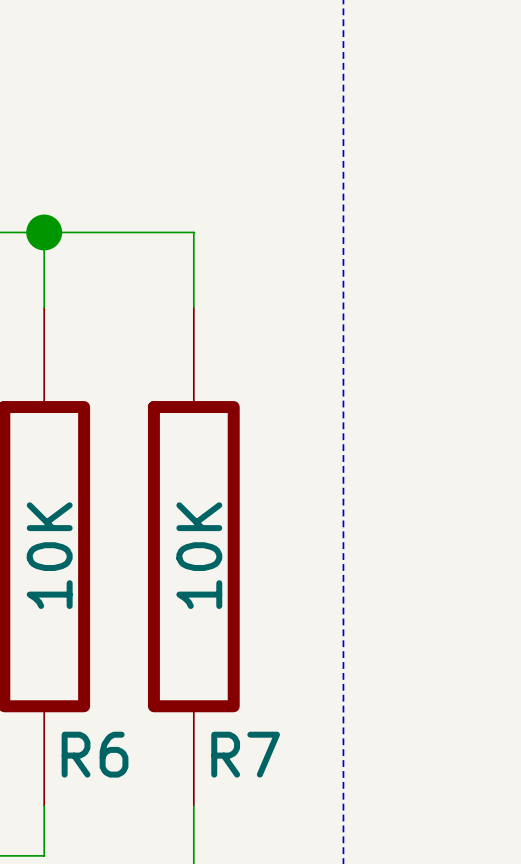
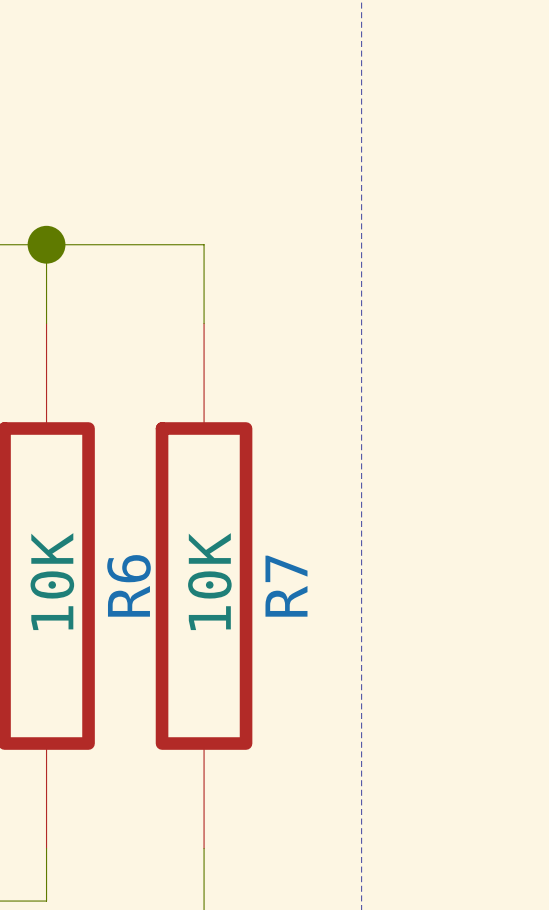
R6 name rotation: 0° (95, 754) -> 90° counterclockwise (129, 585)
R6 name position: R6 (95, 754) -> R6 (129, 585)
R7 name rotation: 0° (245, 754) -> 90° counterclockwise (286, 586)
R7 name position: R7 (245, 754) -> R7 (286, 586)

